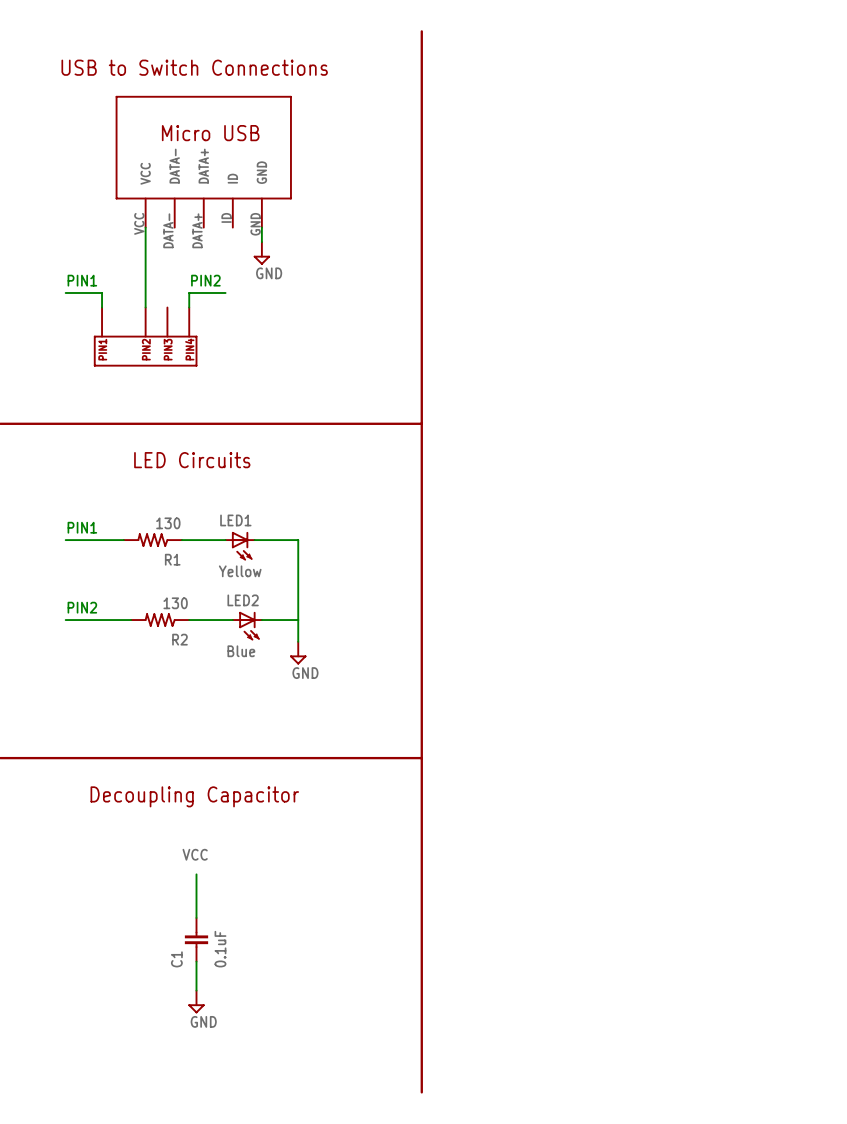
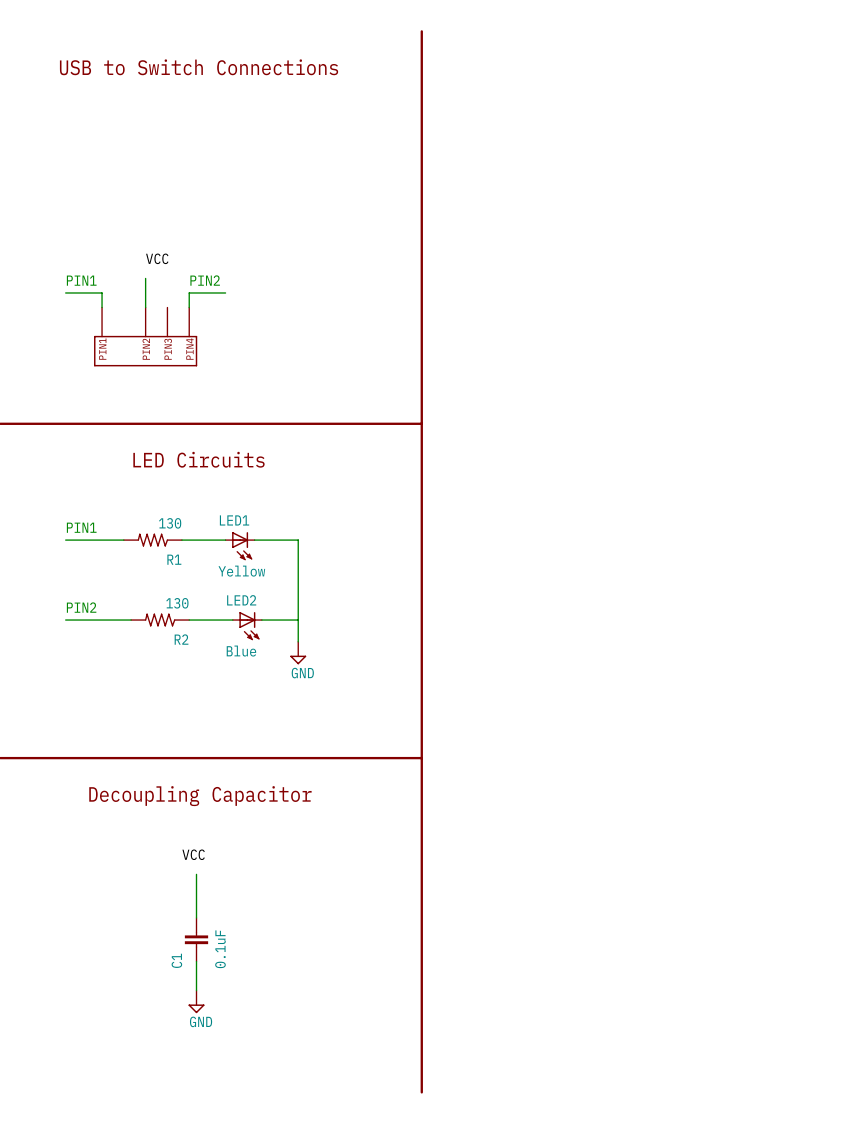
part: (203, 161) -> none
wire: (145, 227) (145, 278) -> none
wire: (261, 227) (261, 242) -> none
power symbol: GND (261, 253) -> none
label: none -> VCC (157, 258)

